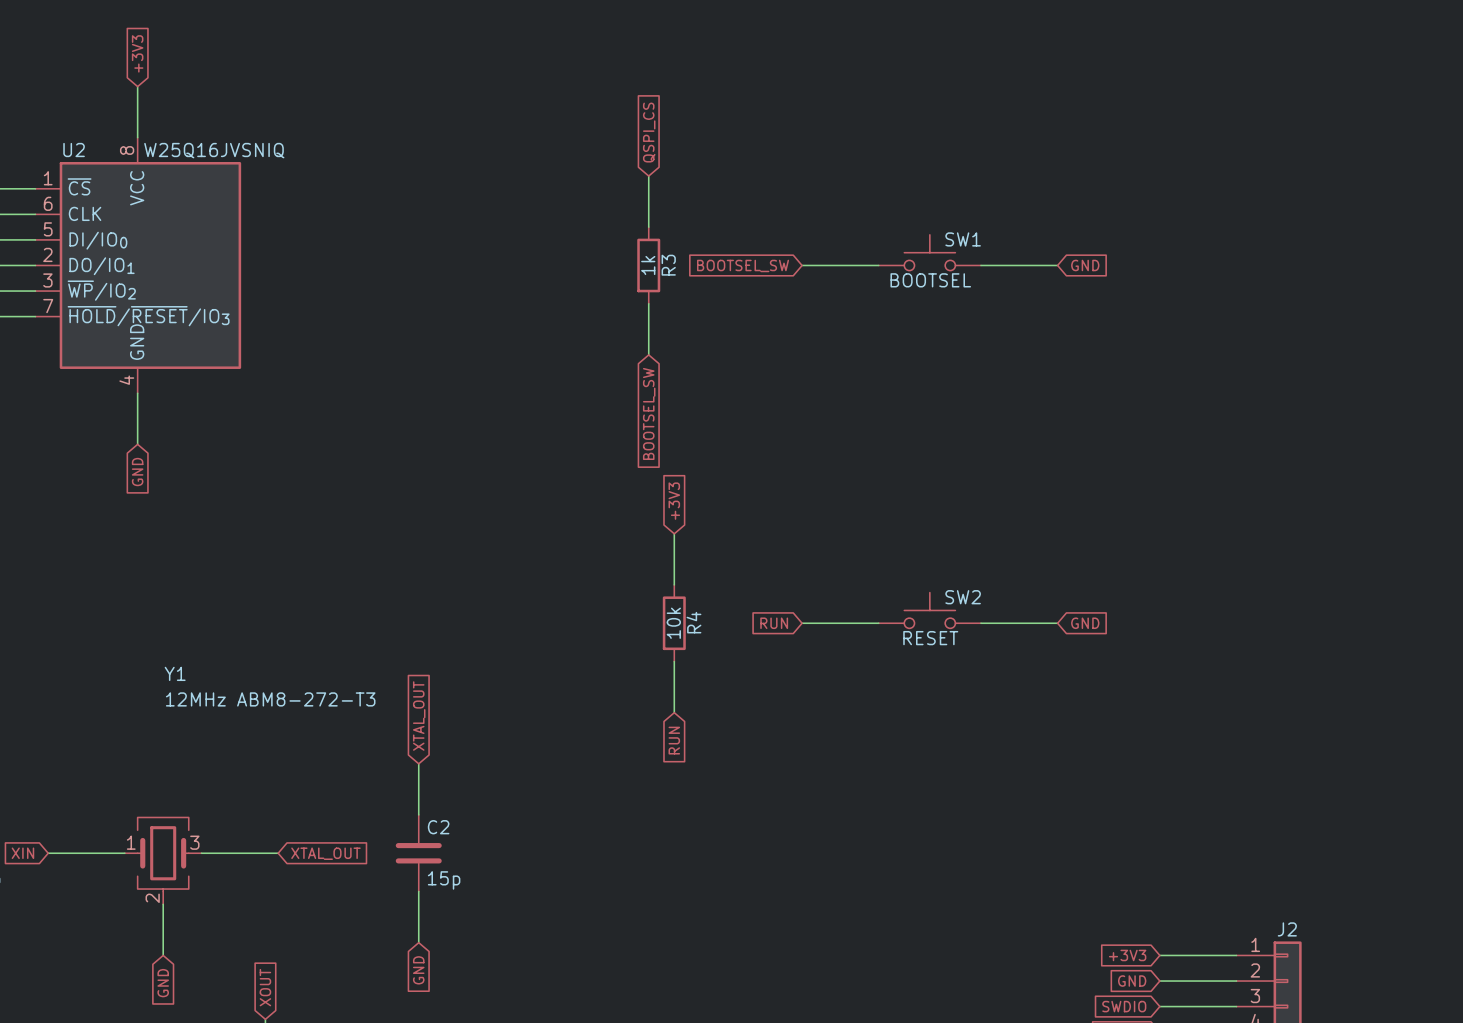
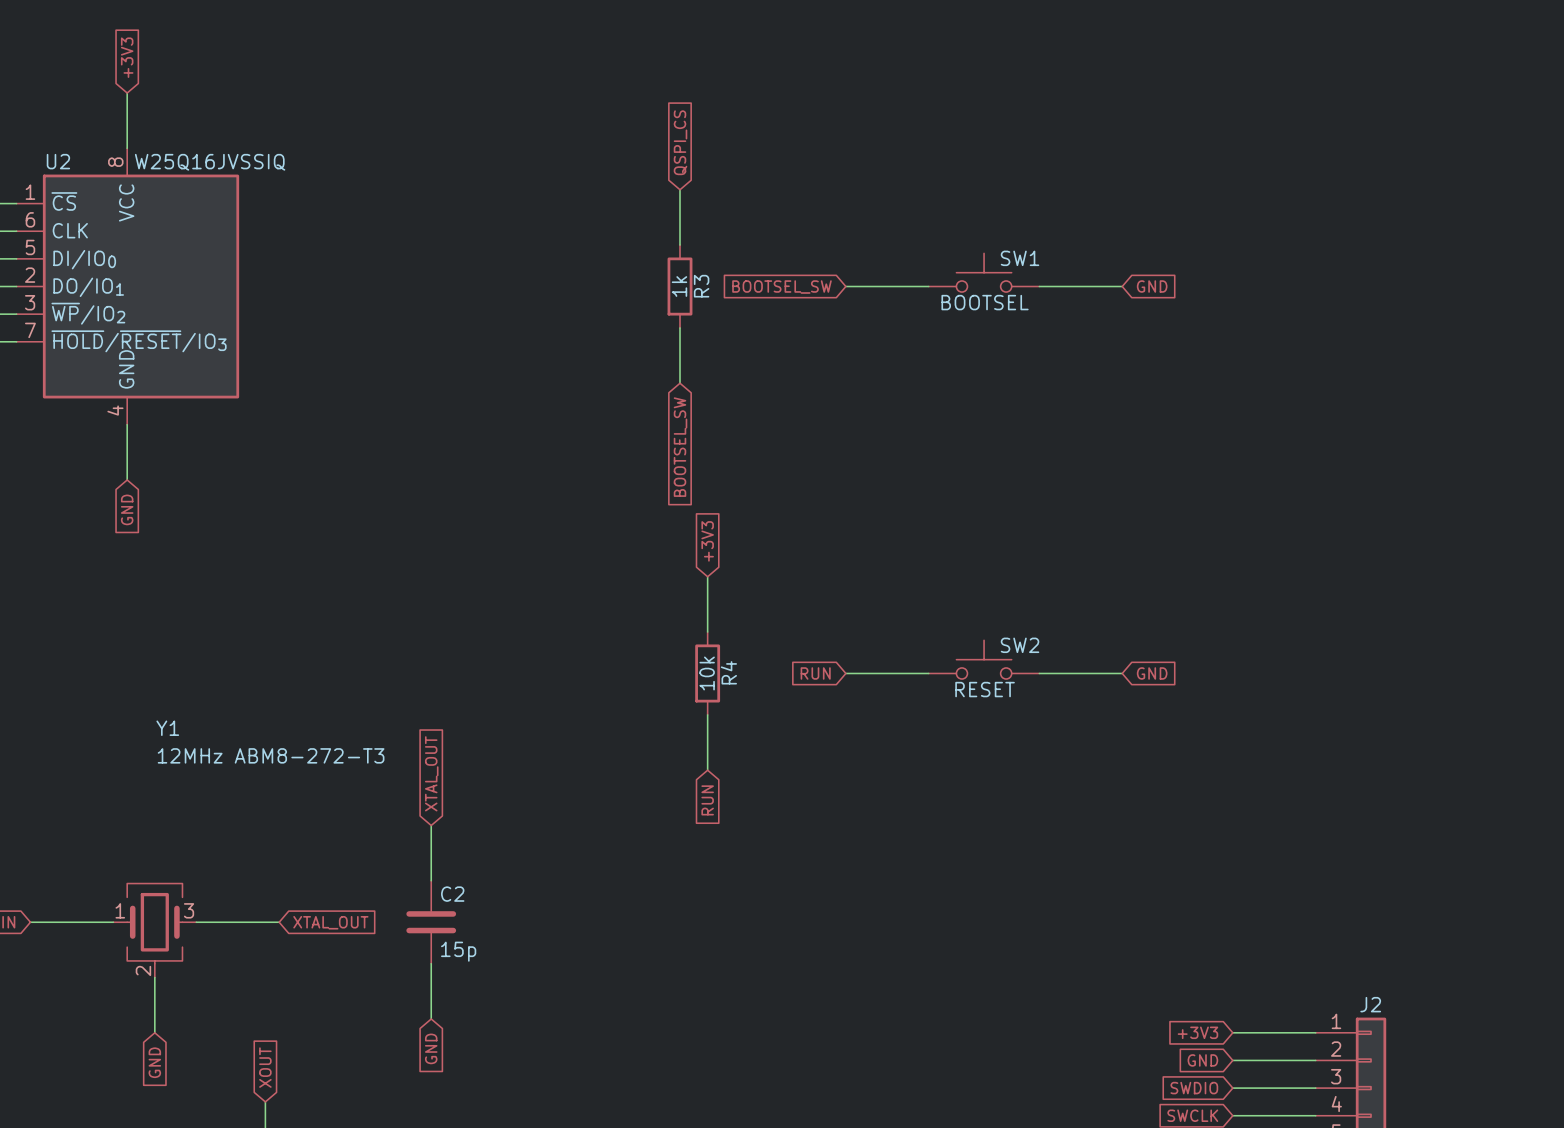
U2 value: W25Q16JVSNIQ (214, 150) -> W25Q16JVSSIQ (210, 162)

